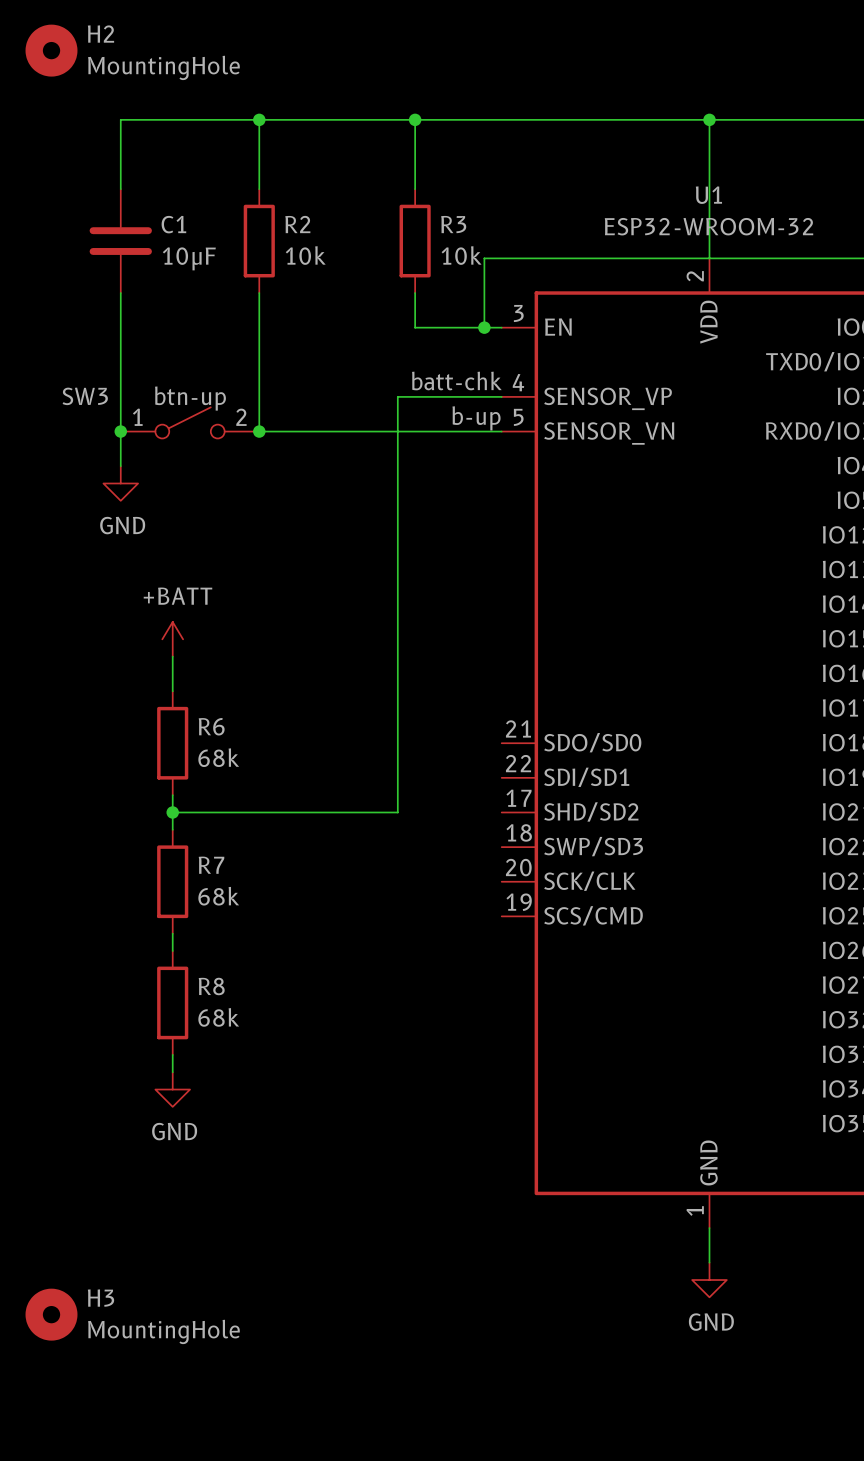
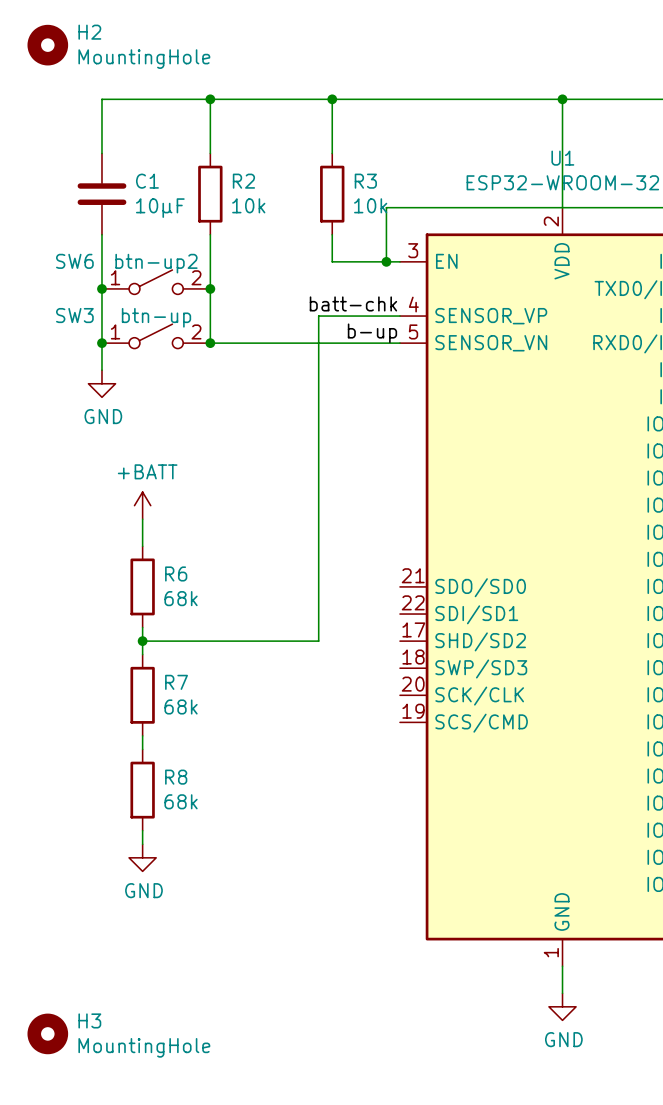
SW6: none -> btn-up2 (156, 282)
junction: none -> (101, 288)
junction: none -> (210, 288)

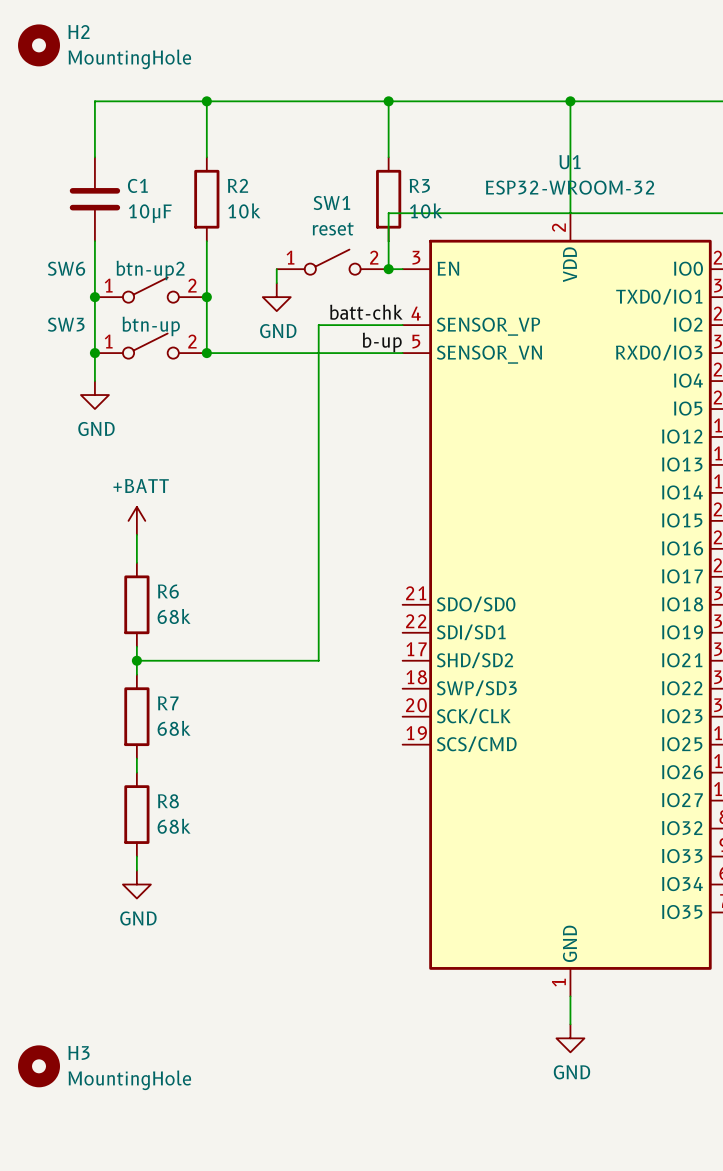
wire: (332, 99) (332, 153) -> (388, 101) (388, 157)
junction position: (332, 99) -> (388, 101)
R3 position: (332, 194) -> (388, 199)
wire: (332, 234) (332, 261) (386, 261) -> none
SW1: none -> reset (332, 262)
wire: none -> (276, 269) (276, 283)
power symbol: none -> GND (276, 297)

